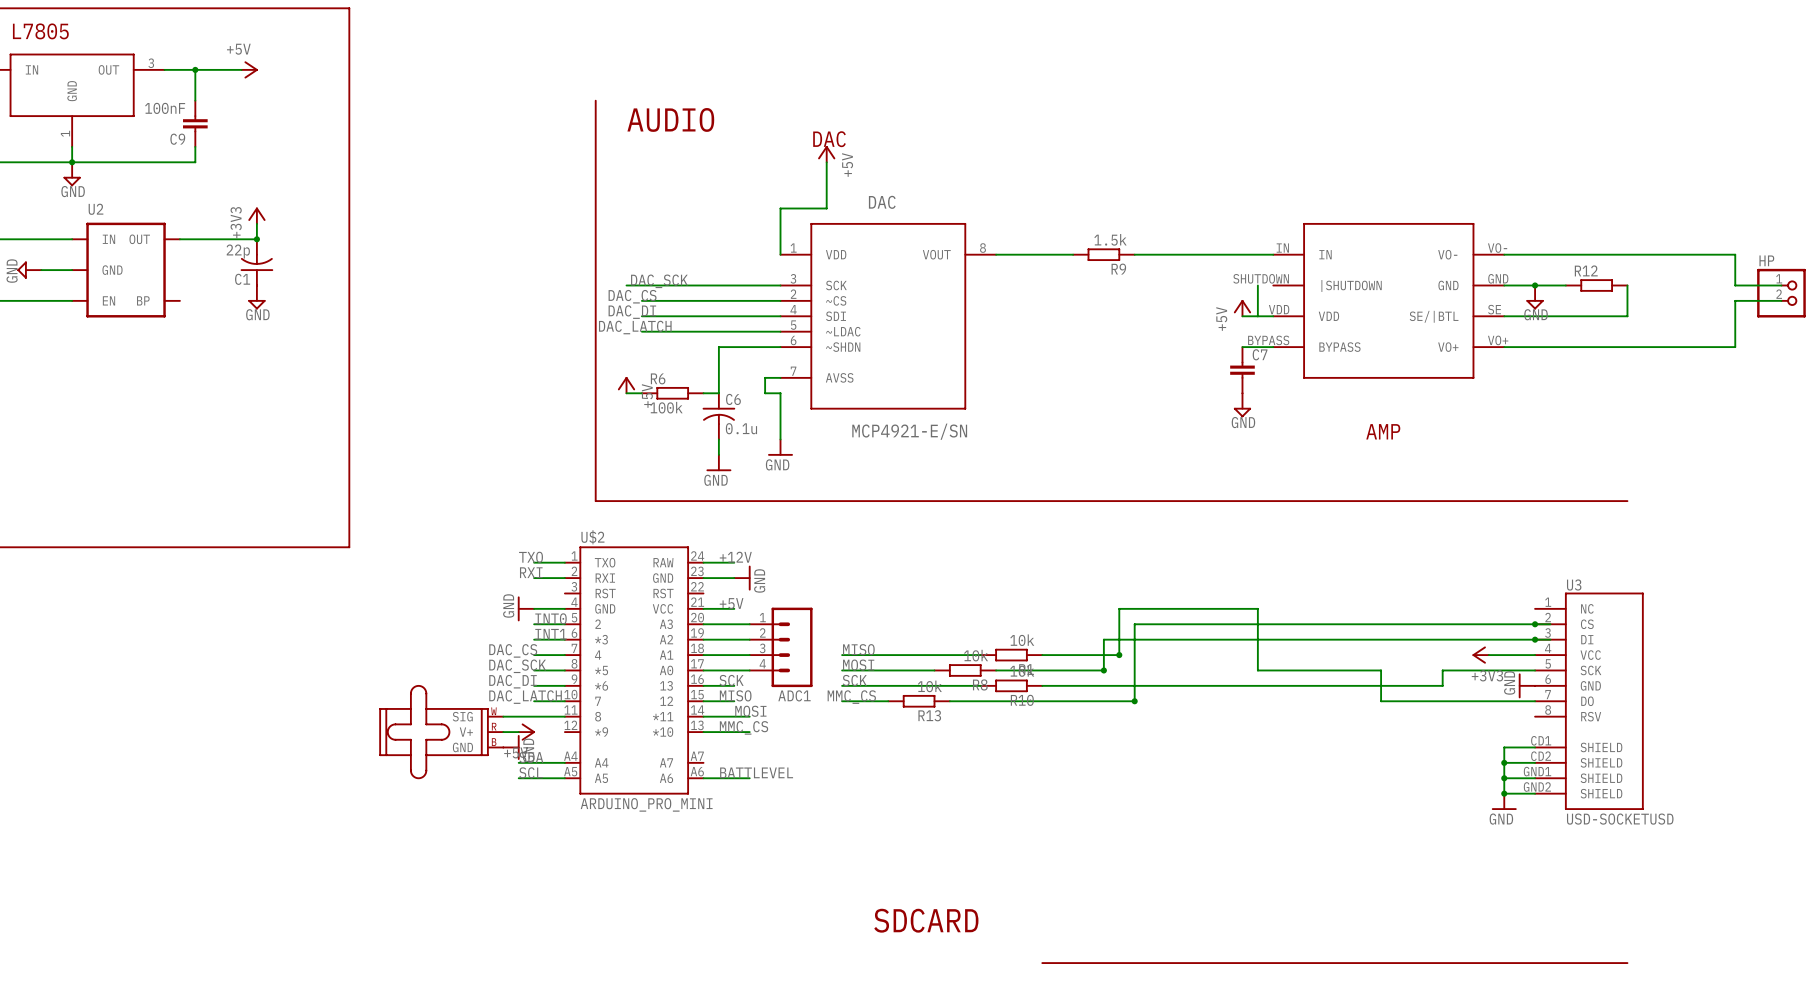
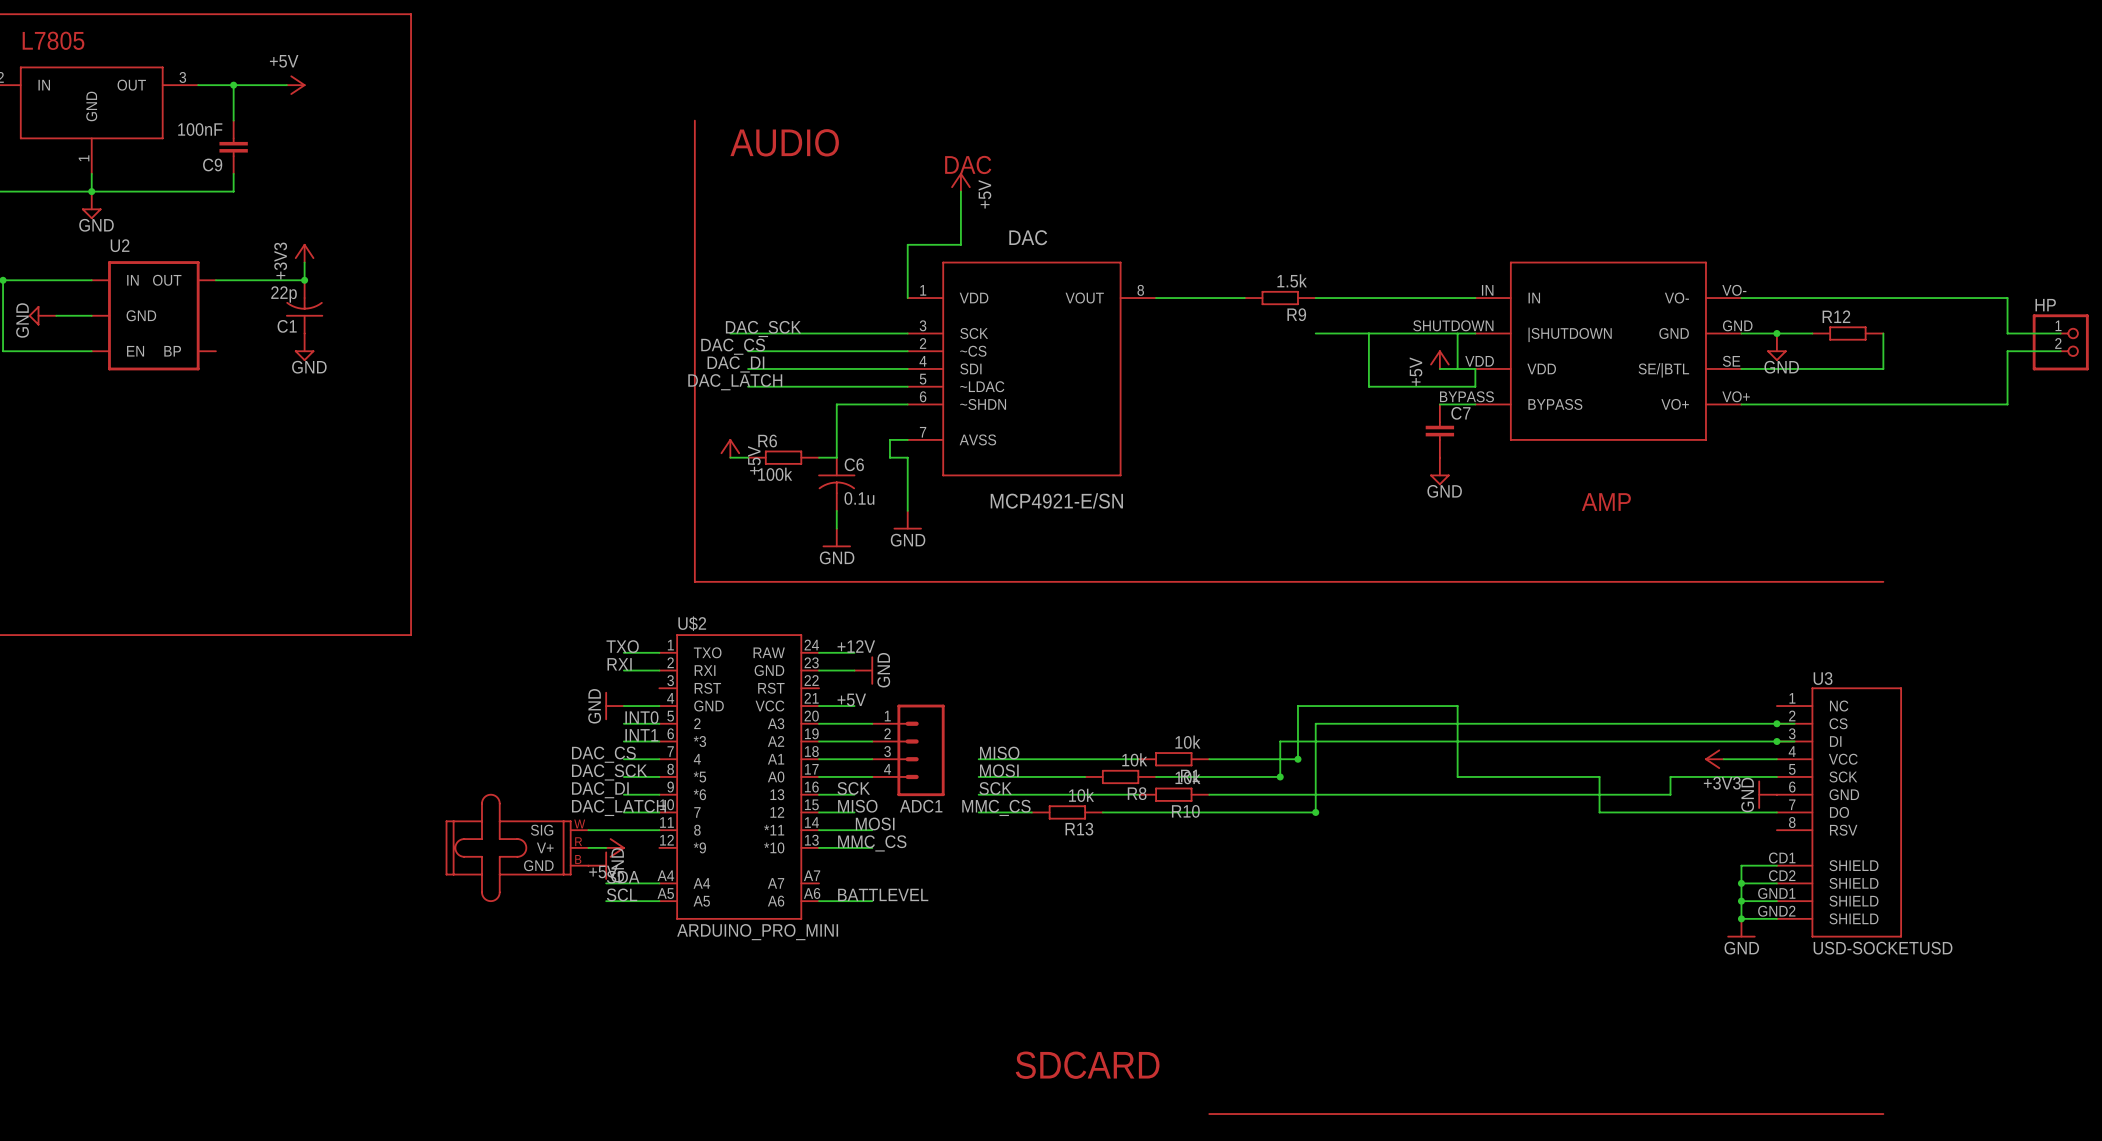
wire: none -> (1315, 333) (1475, 333)
wire: none -> (1368, 333) (1368, 386) (1475, 386) (1475, 368)

